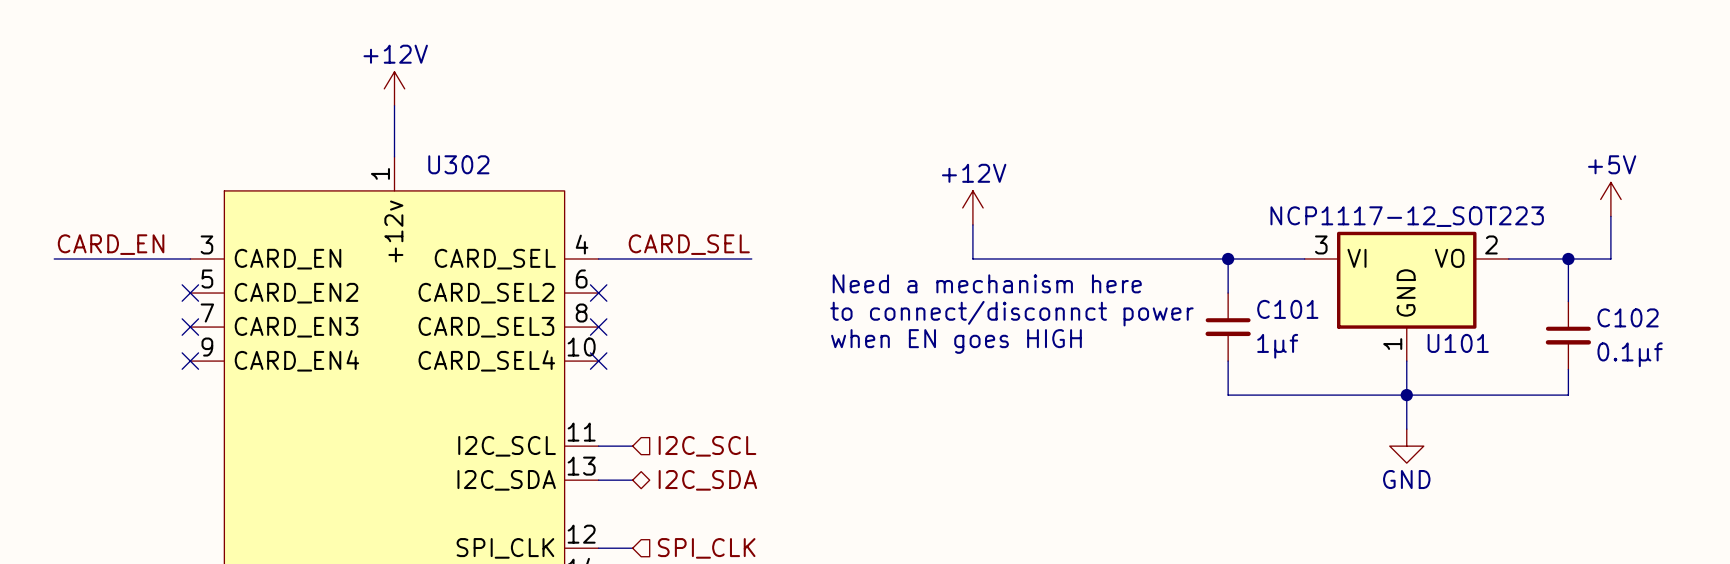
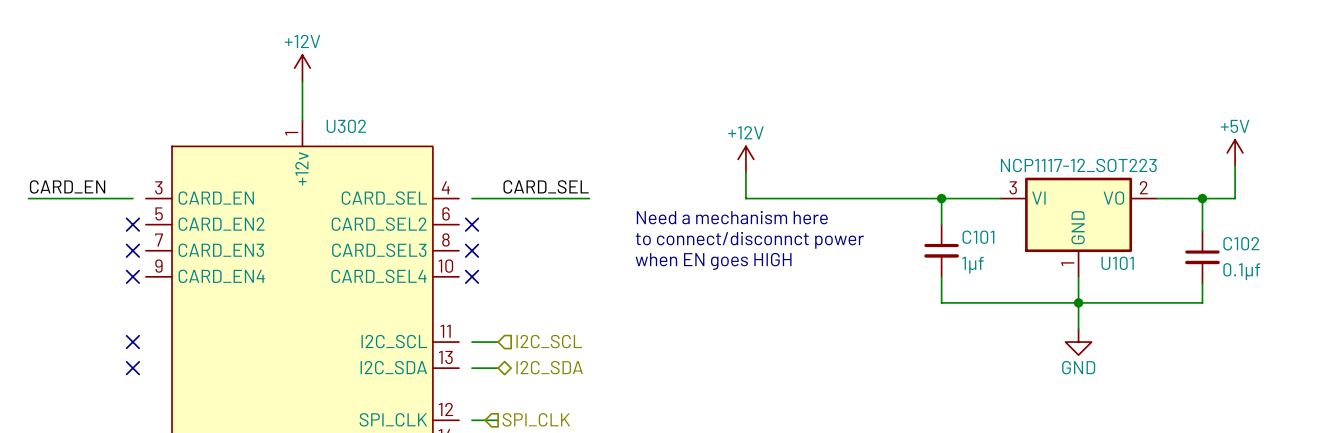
label position: CARD_EN (111, 244) -> CARD_EN (67, 186)
label position: CARD_SEL (689, 244) -> CARD_SEL (546, 186)
wire: (173, 258) (190, 258) -> (28, 198) (41, 198)
wire: (598, 258) (615, 258) -> (576, 198) (589, 198)
no-connect mark position: (190, 293) -> (132, 224)
no-connect mark position: (598, 293) -> (472, 224)
no-connect mark position: (190, 327) -> (132, 250)
no-connect mark position: (598, 327) -> (472, 250)
no-connect mark position: (190, 361) -> (132, 276)
no-connect mark position: (598, 361) -> (472, 276)
no-connect mark: none -> (132, 342)
wire: (598, 446) (615, 446) -> (485, 342) (498, 342)
hierarchical label position: I2C_SCL (707, 446) -> I2C_SCL (549, 341)
no-connect mark: none -> (132, 368)
wire: (598, 480) (615, 480) -> (485, 368) (498, 368)
hierarchical label position: I2C_SDA (707, 480) -> I2C_SDA (549, 367)
wire: (598, 548) (615, 548) -> (485, 420) (498, 420)

